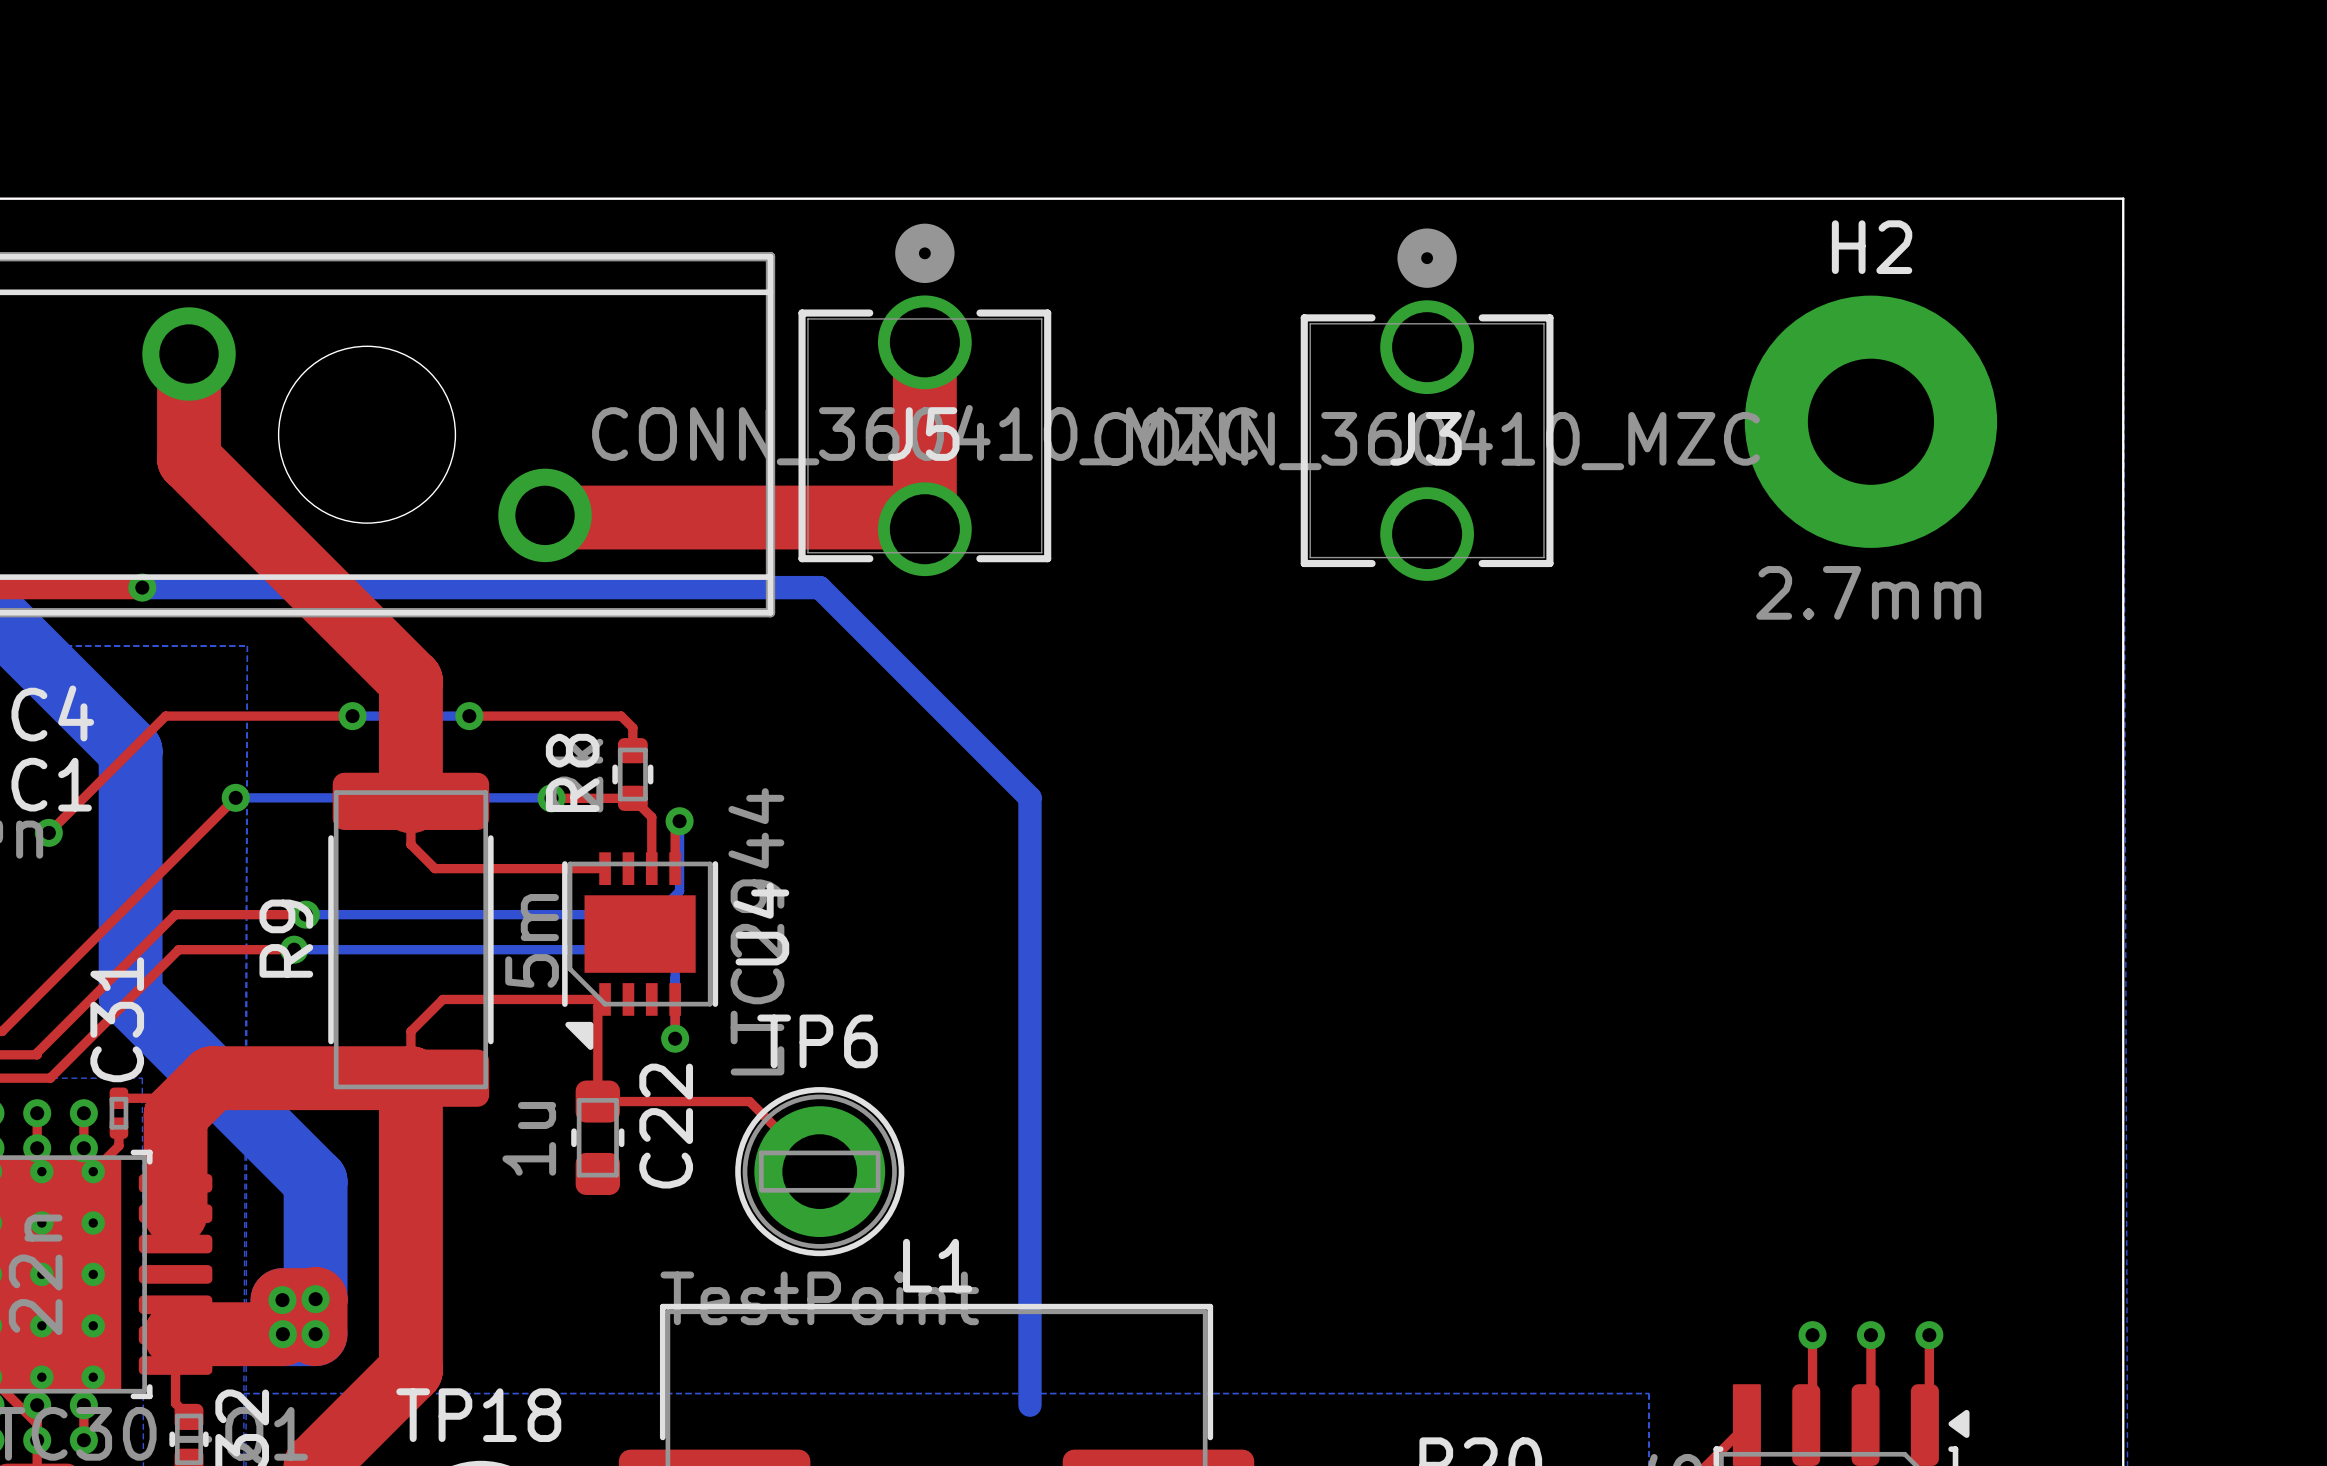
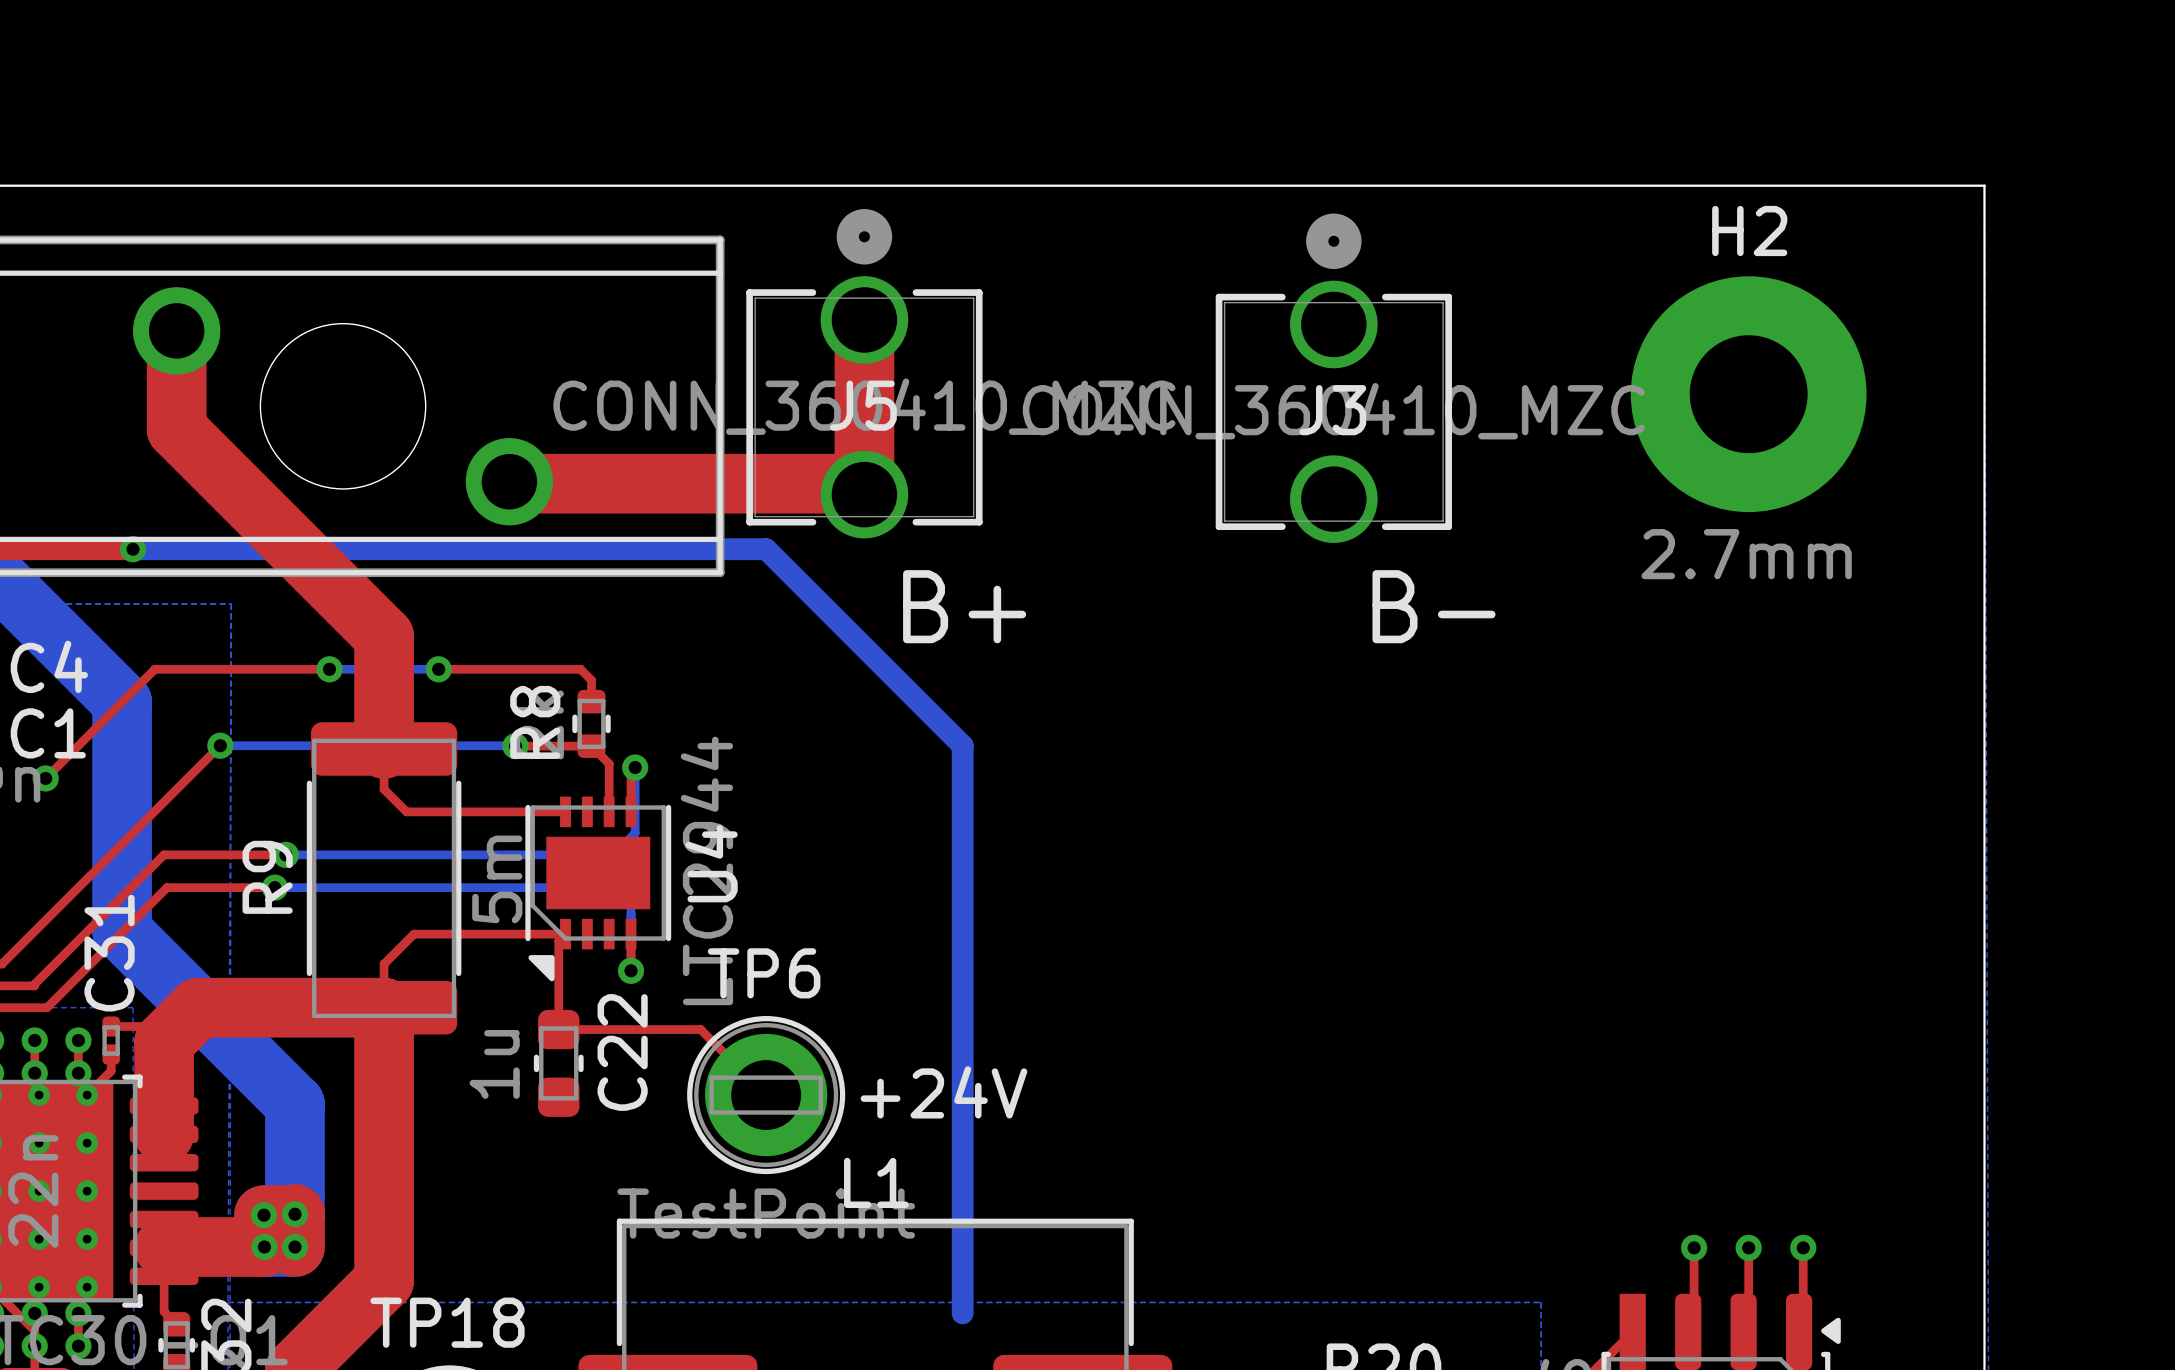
text: none -> B+ (964, 606)
text: none -> B- (1434, 606)
TP6 text: none -> +24V (943, 1092)

